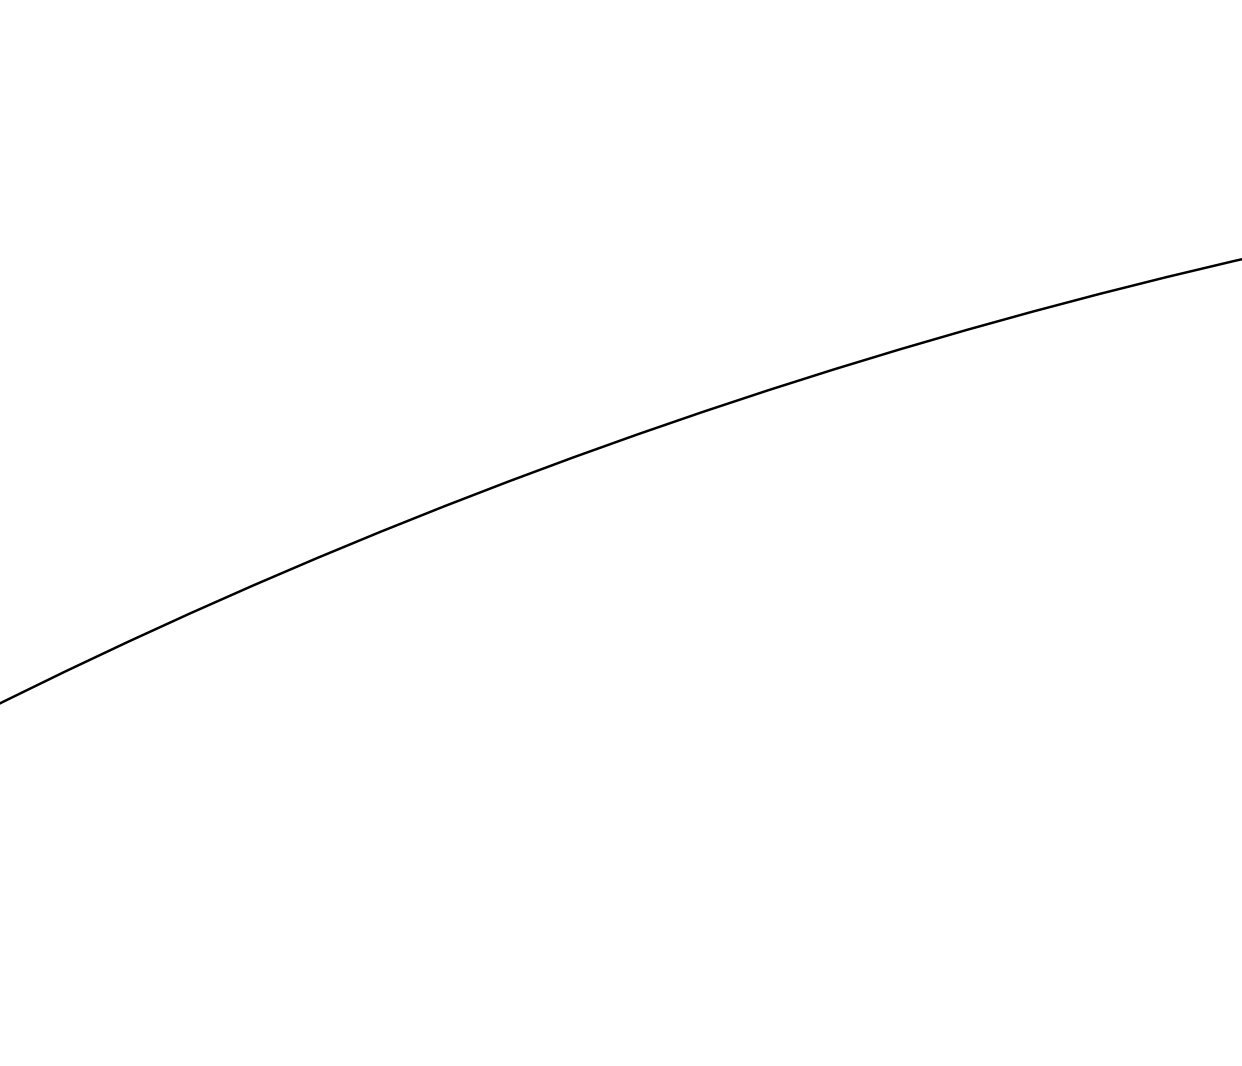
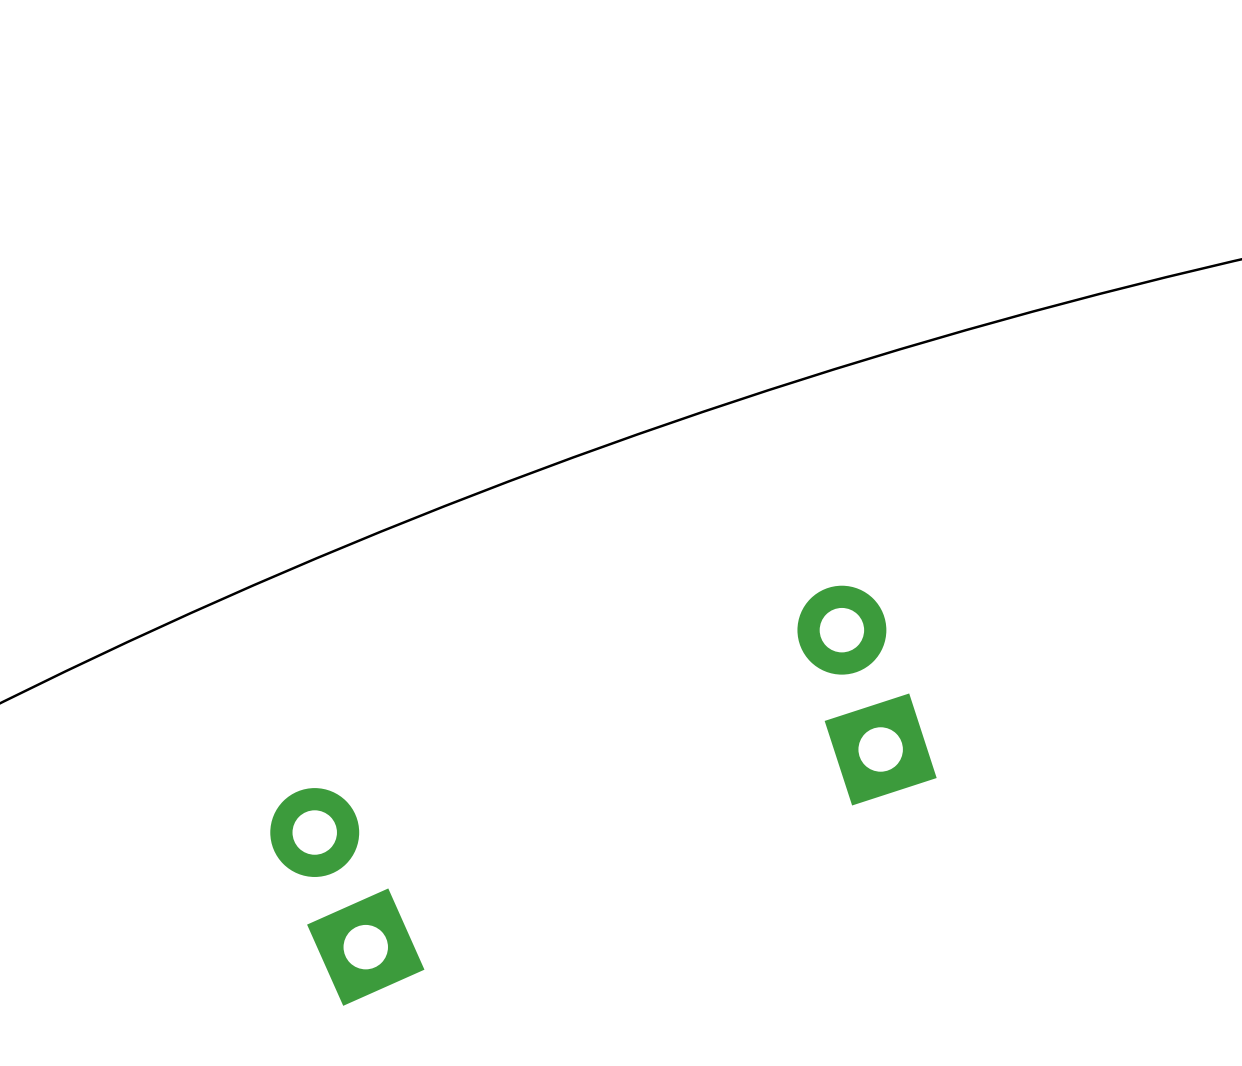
part: none -> (867, 695)
part: none -> (347, 896)

